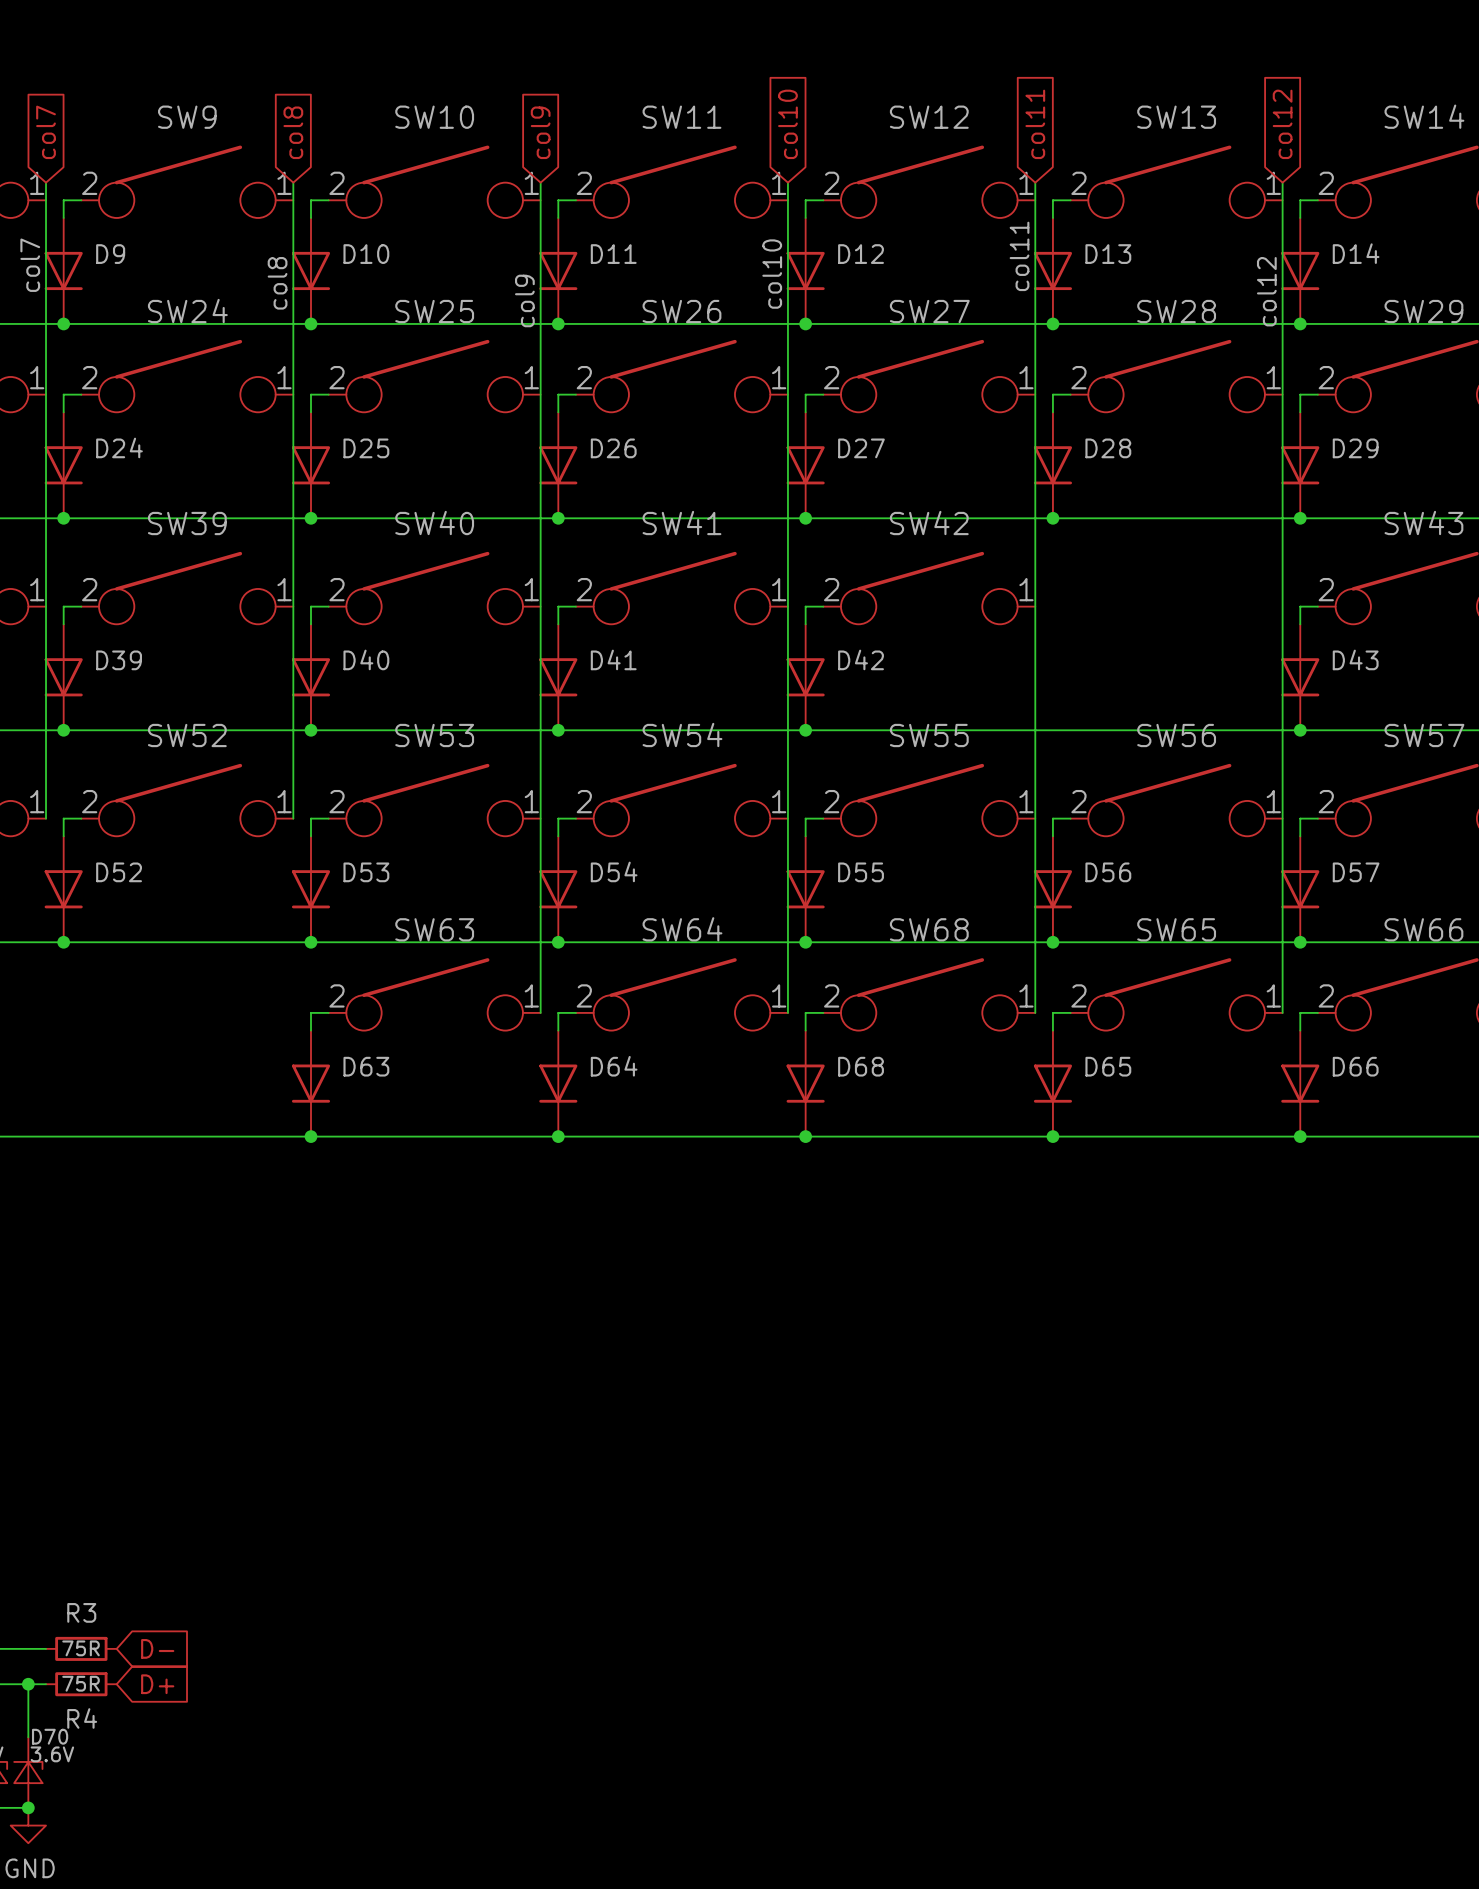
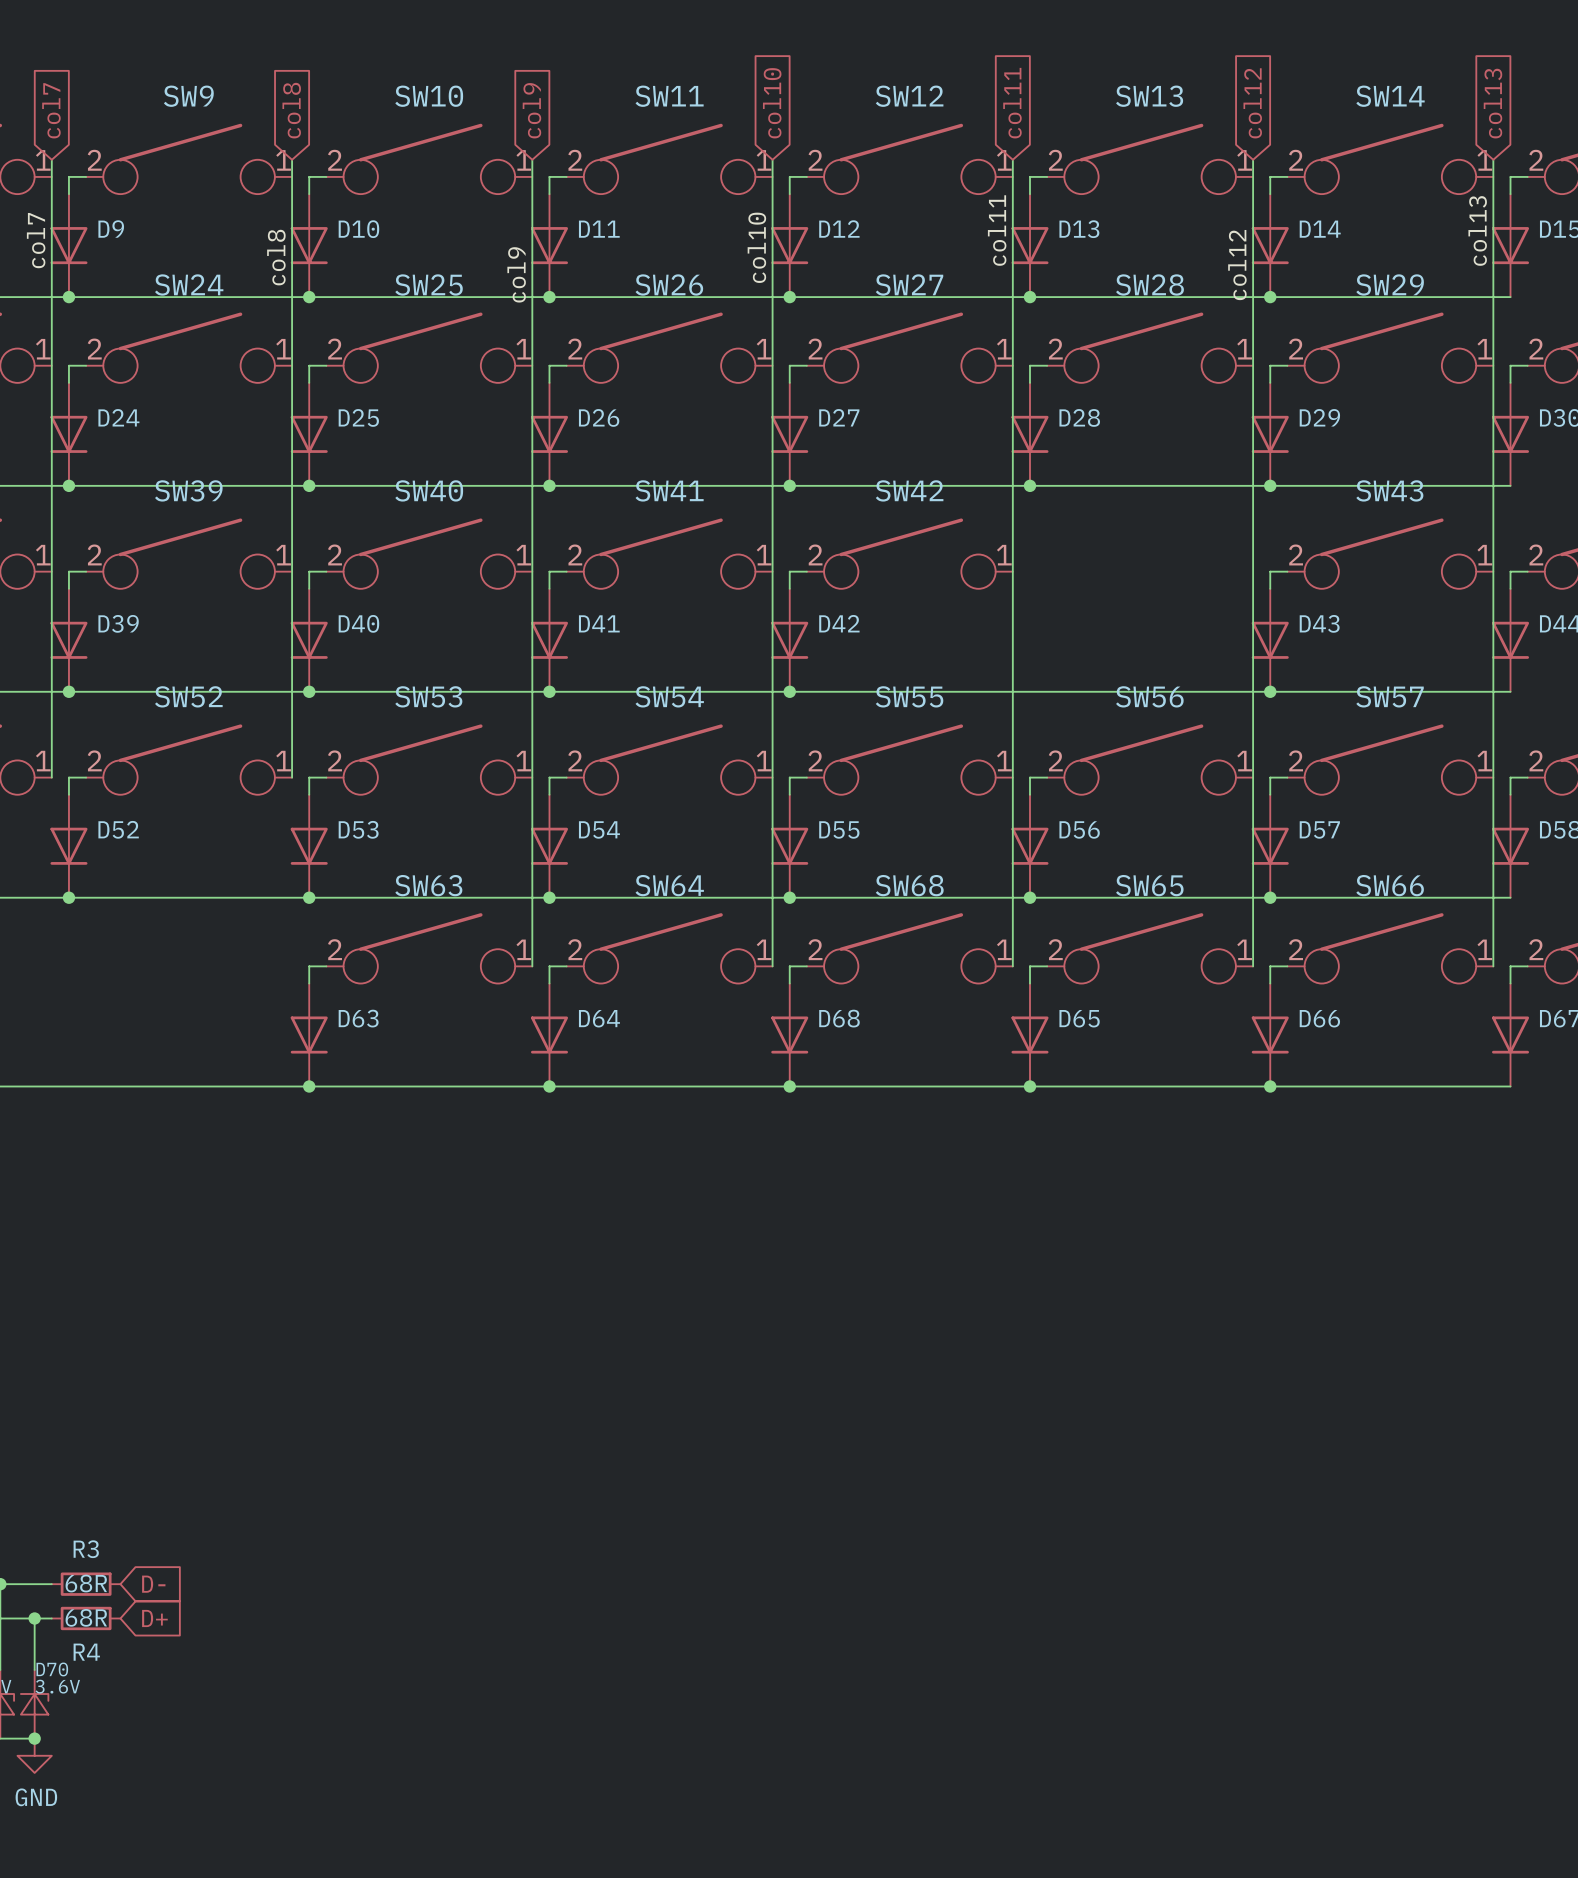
R3 value: 75R (81, 1648) -> 68R (86, 1583)
R4 value: 75R (81, 1683) -> 68R (86, 1617)

